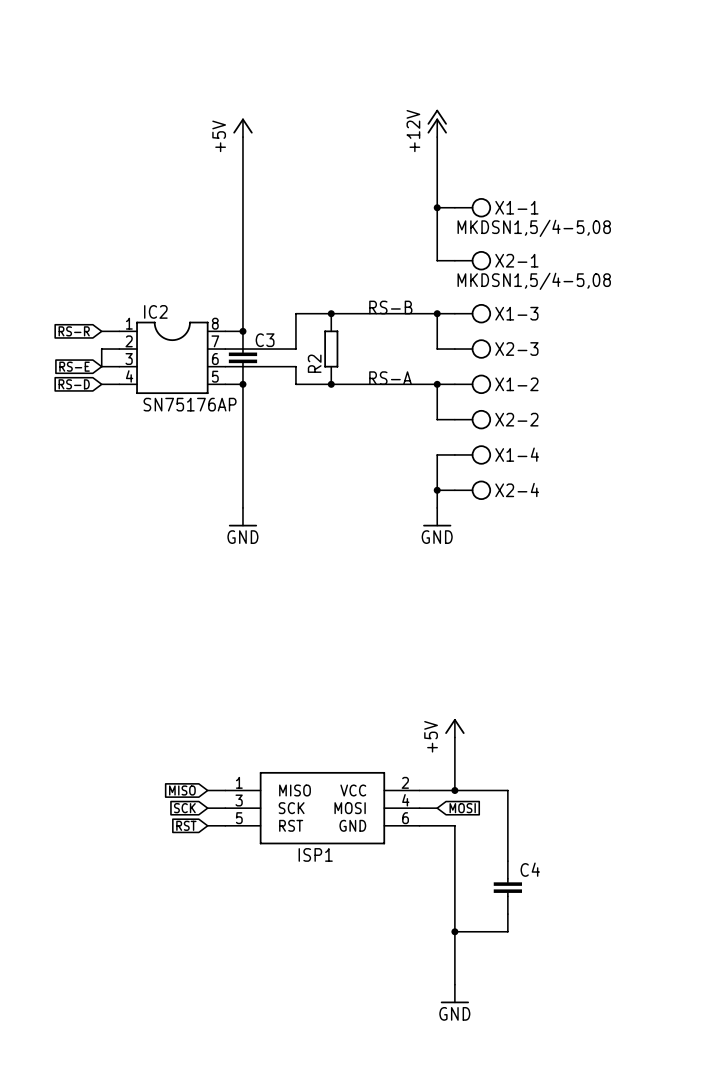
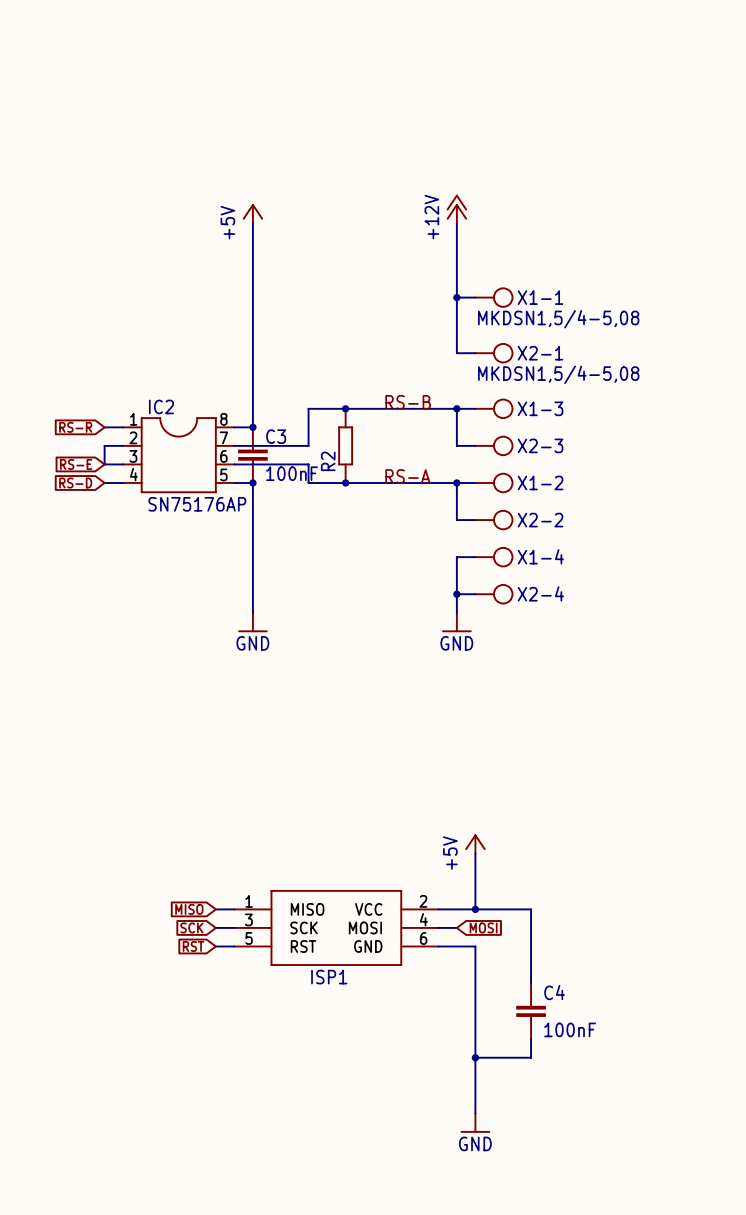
C3 value: none -> 100nF (291, 473)
C4 value: none -> 100nF (570, 1029)

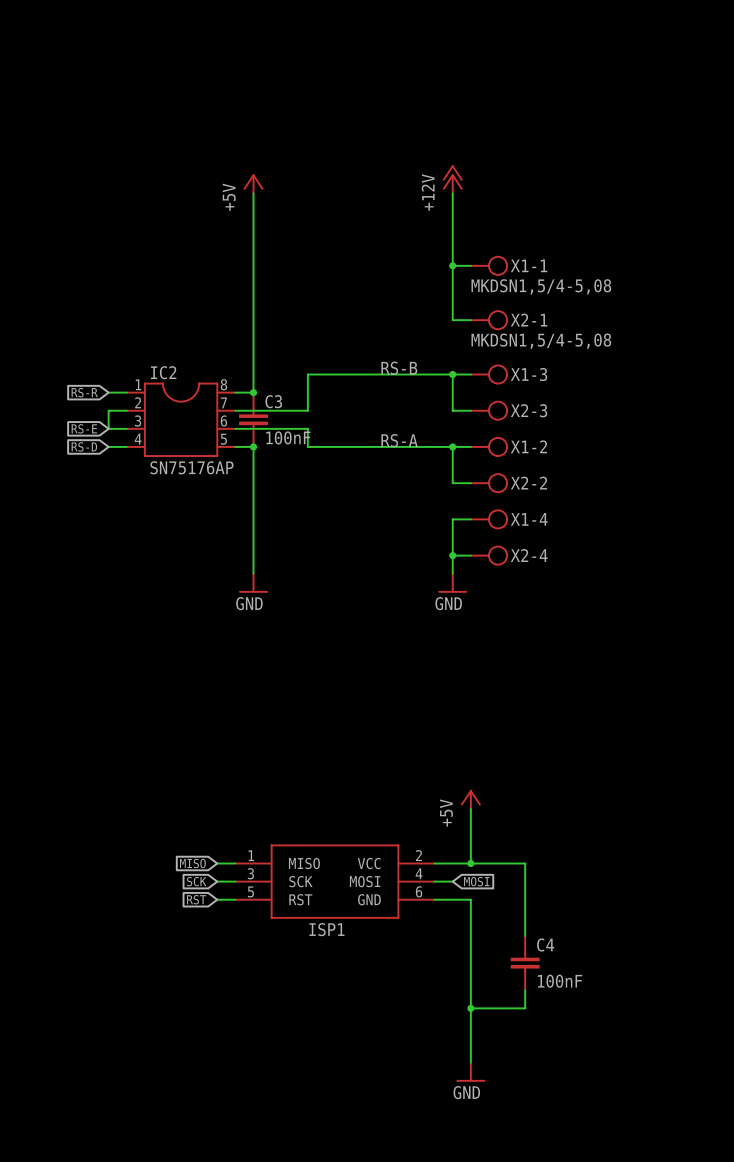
junction: (345, 408) -> none
R2: (345, 445) -> none
junction: (345, 482) -> none

